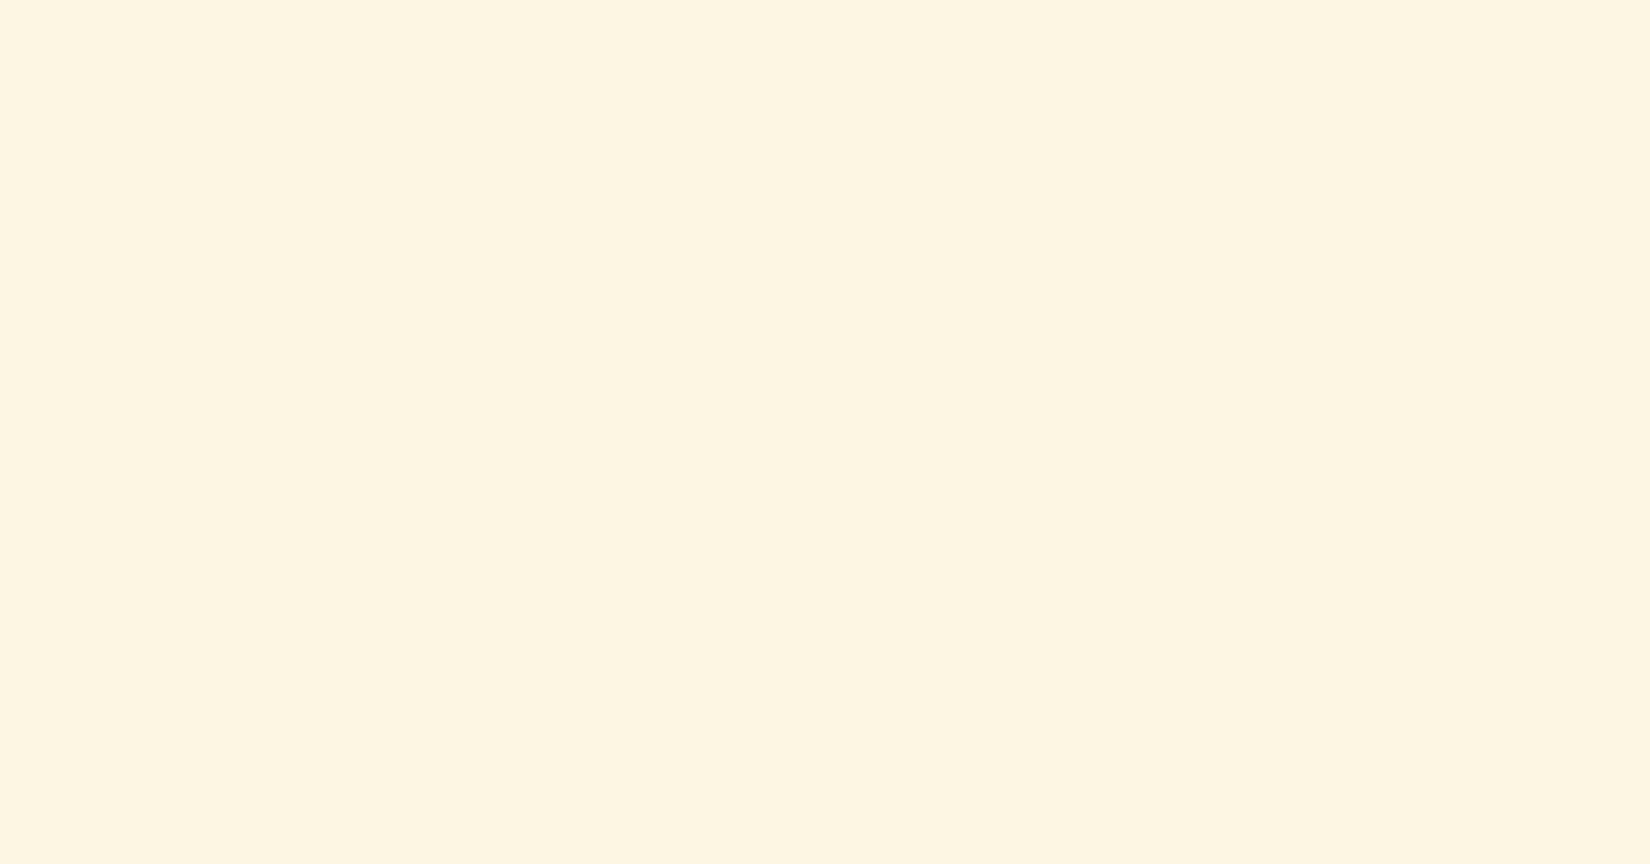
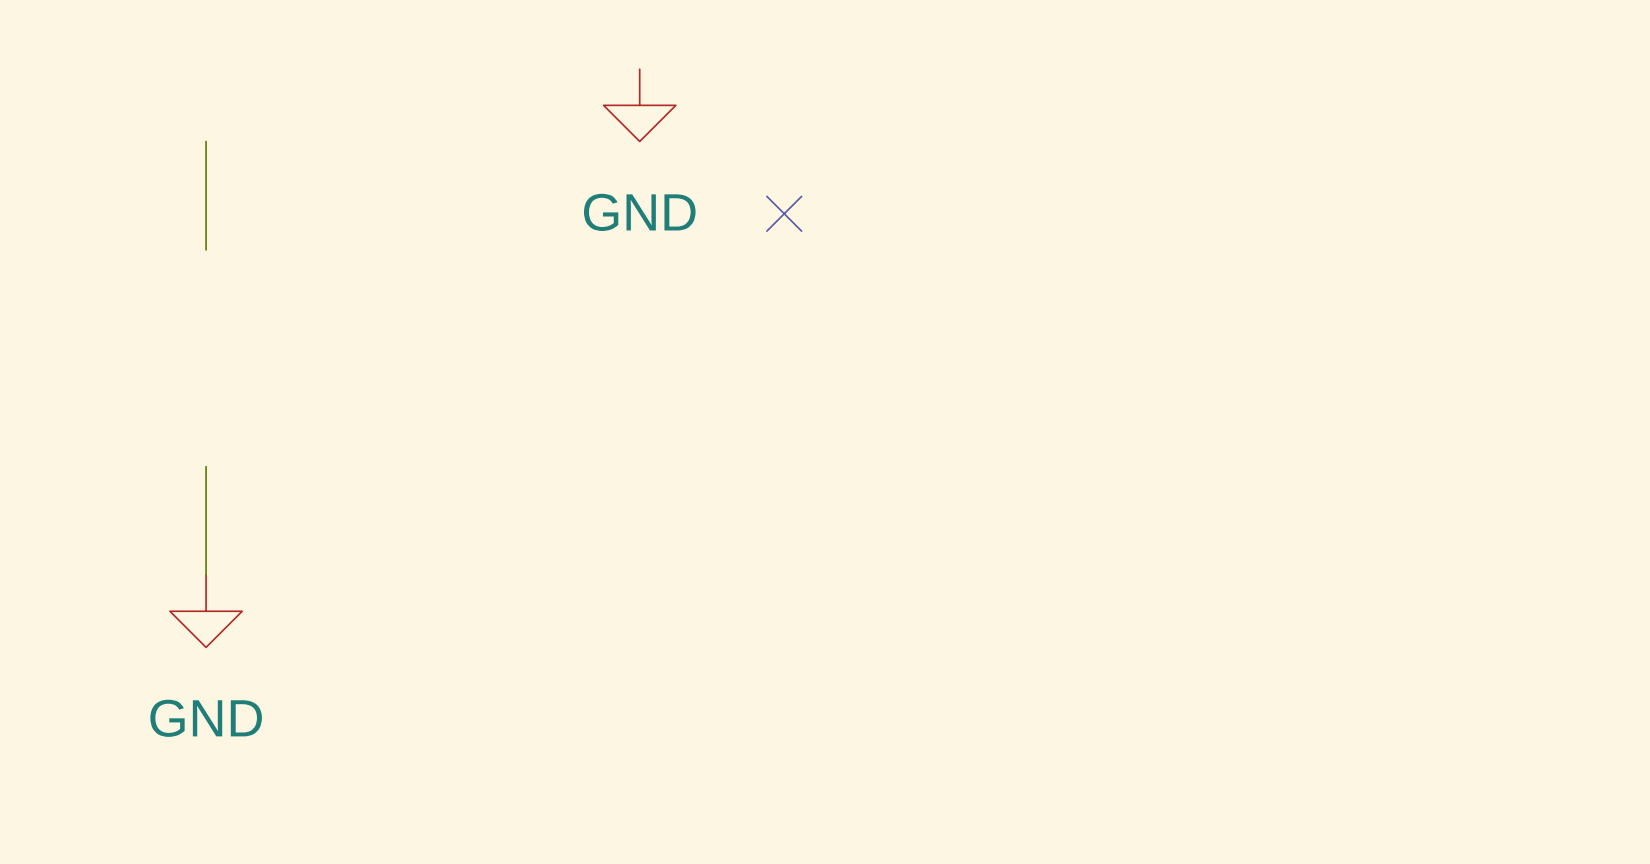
power symbol: none -> GND (639, 105)
wire: none -> (206, 141) (206, 249)
no-connect mark: none -> (784, 213)
wire: none -> (206, 466) (206, 575)
power symbol: none -> GND (206, 611)

